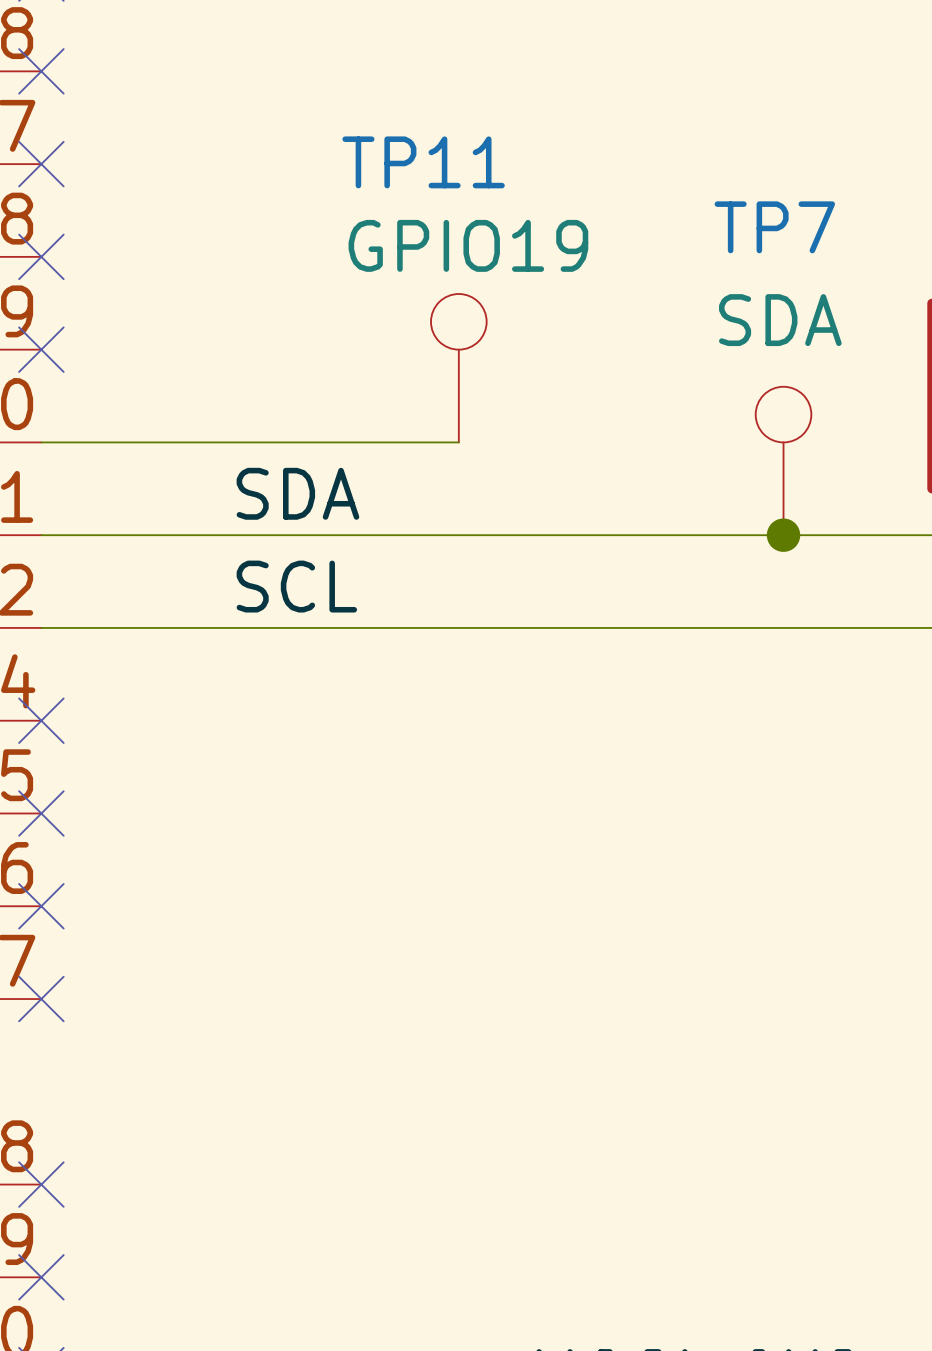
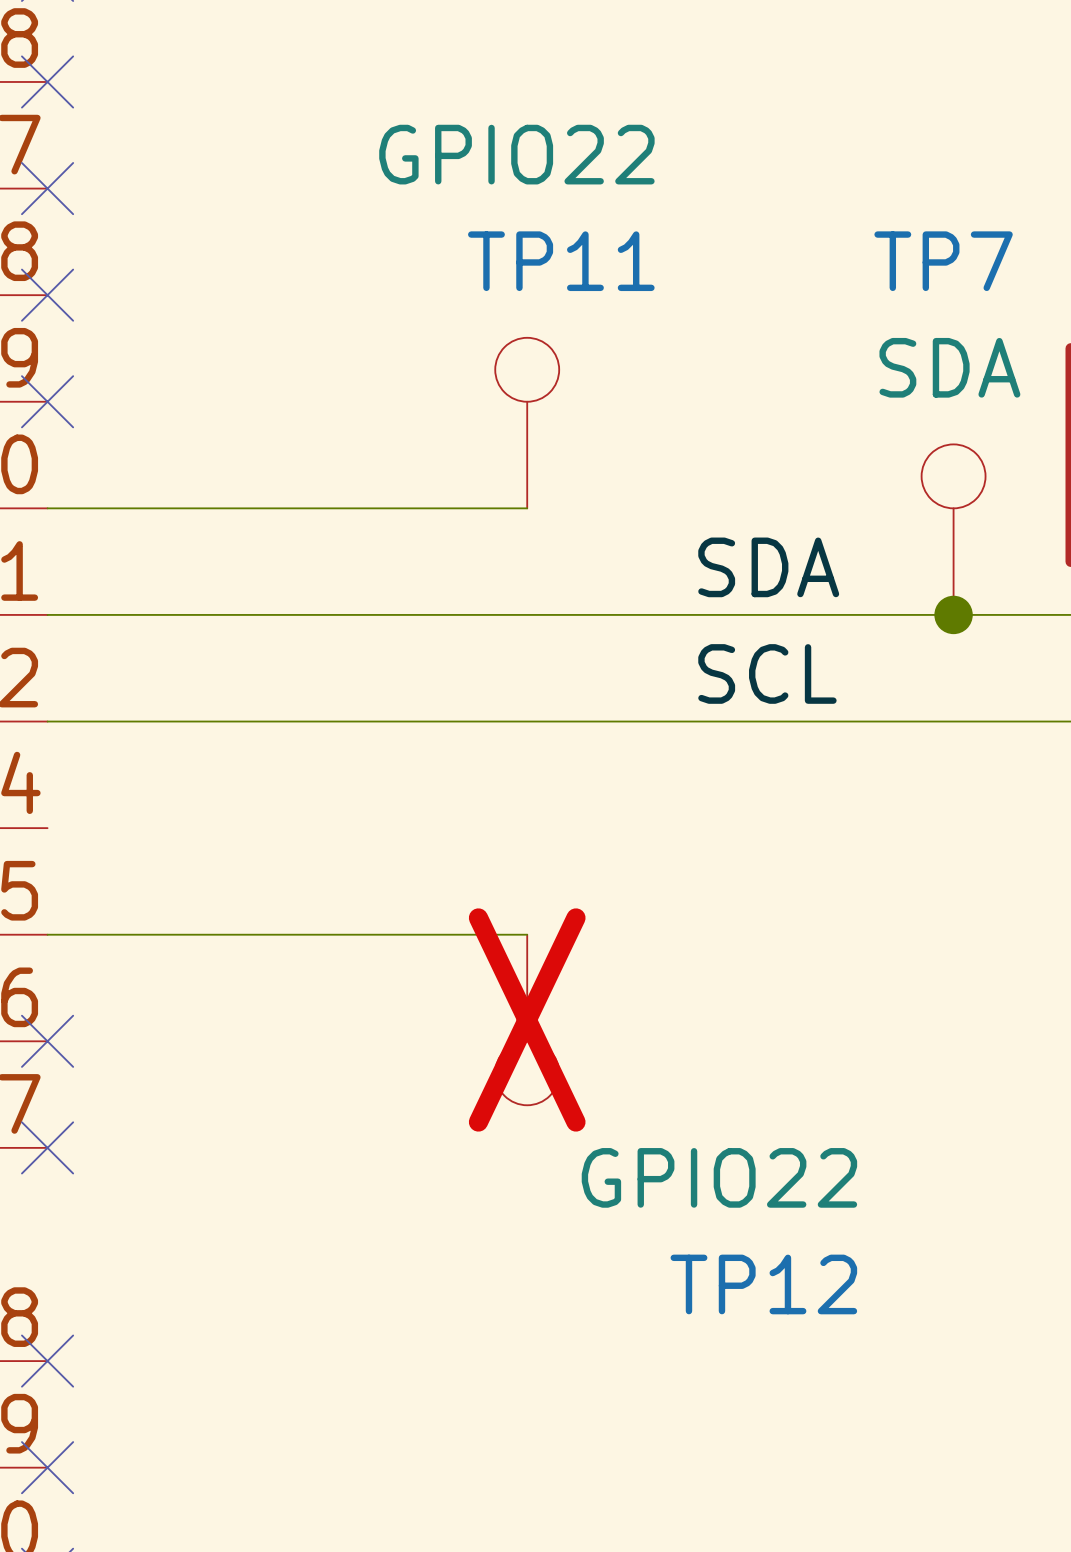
TP11 name position: TP11 (423, 162) -> TP11 (561, 261)
TP11 value: GPIO19 (468, 245) -> GPIO22 (516, 154)
TP7 position: (783, 460) -> (953, 529)
label position: SDA (297, 493) -> SDA (768, 567)
junction position: (783, 535) -> (953, 614)
label position: SCL (296, 586) -> SCL (767, 673)
no-connect mark: (41, 720) -> none
wire: none -> (47, 934) (527, 934)
no-connect mark: (41, 813) -> none
TP12: none -> GPIO22 (527, 1019)

